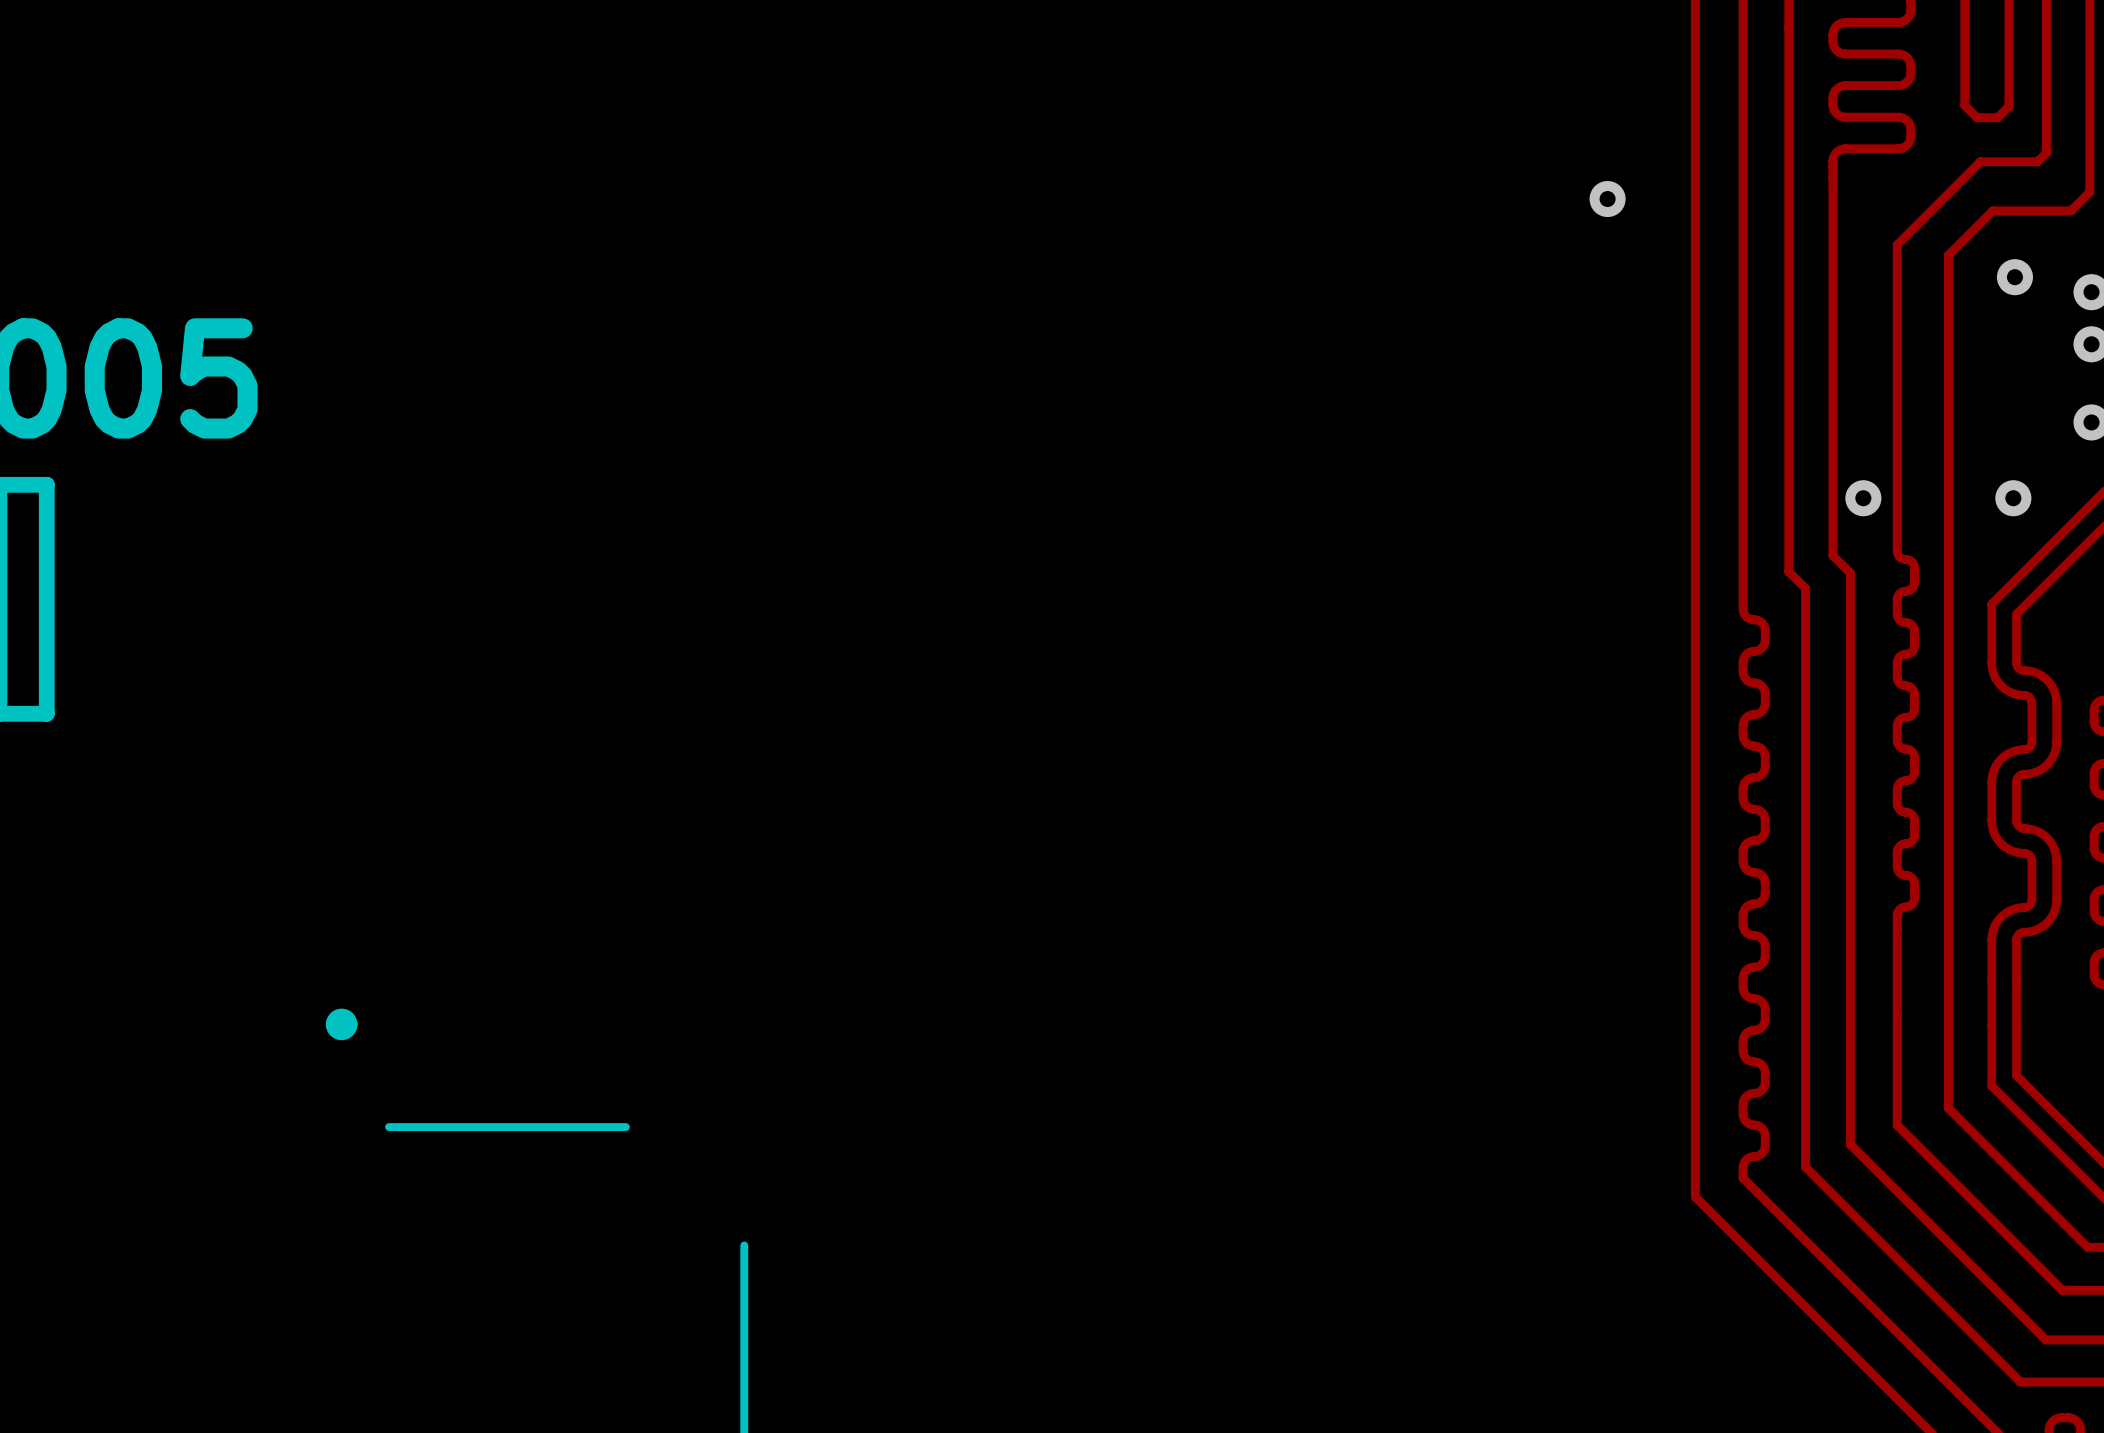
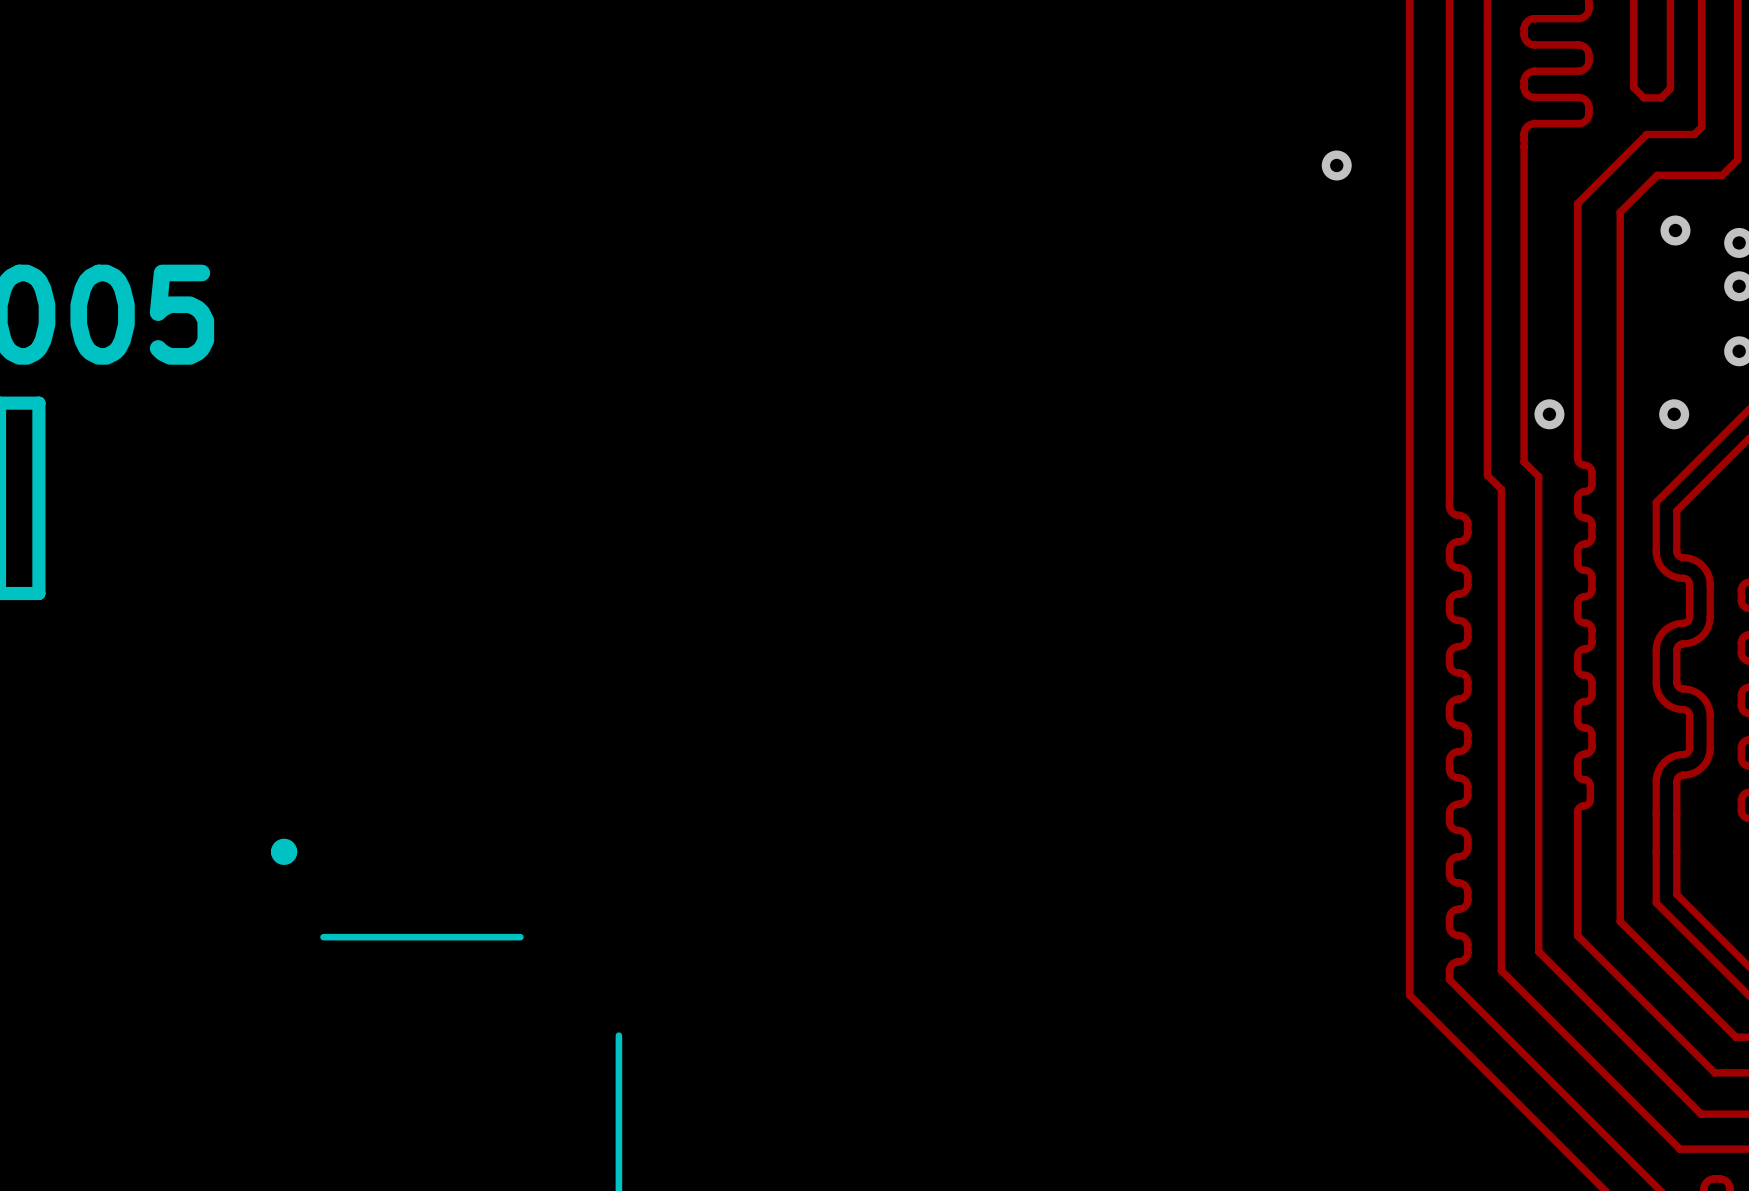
track: (1897, 929) (1897, 976) -> (1577, 773) (1580, 778) (1588, 781) (1590, 785) (1589, 801) (1580, 807) (1577, 812)

